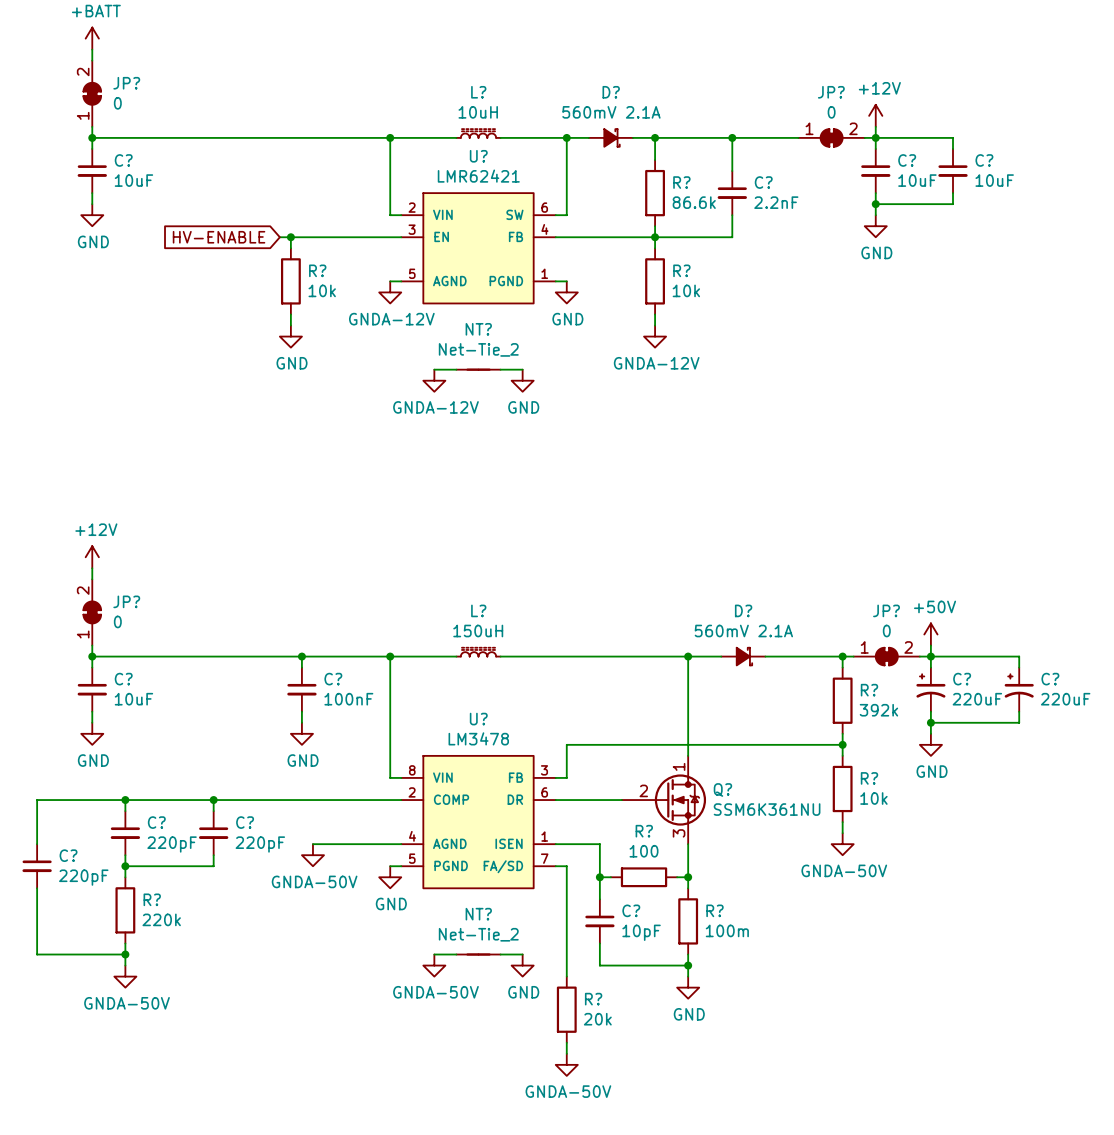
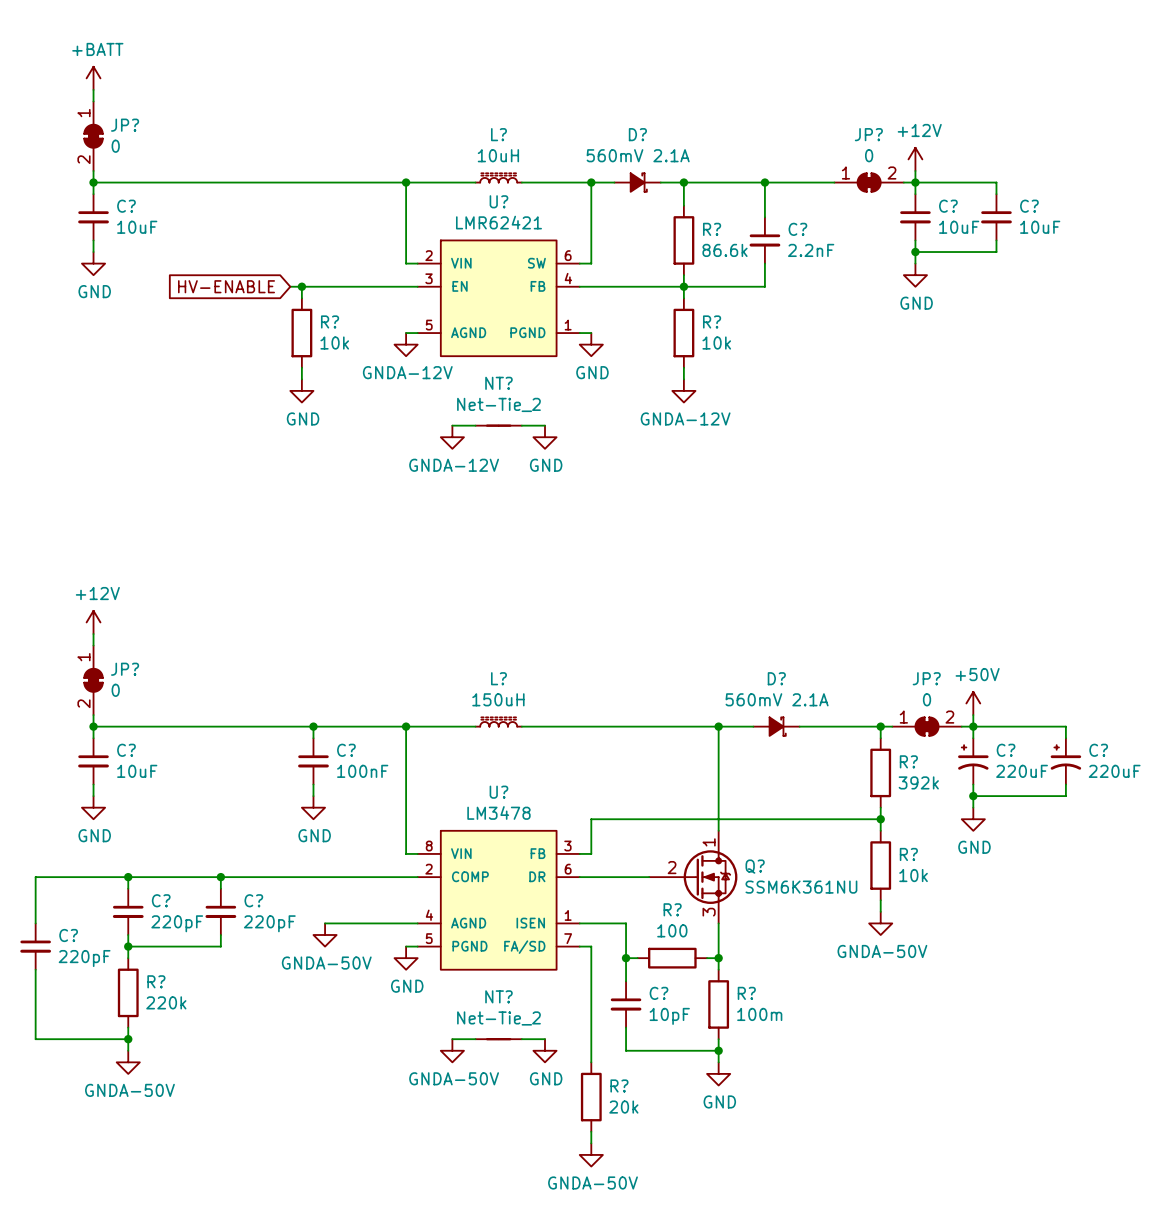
JP? rotation: 0° (92, 93) -> 180° (93, 136)
JP? rotation: 0° (92, 612) -> 180° (93, 680)

